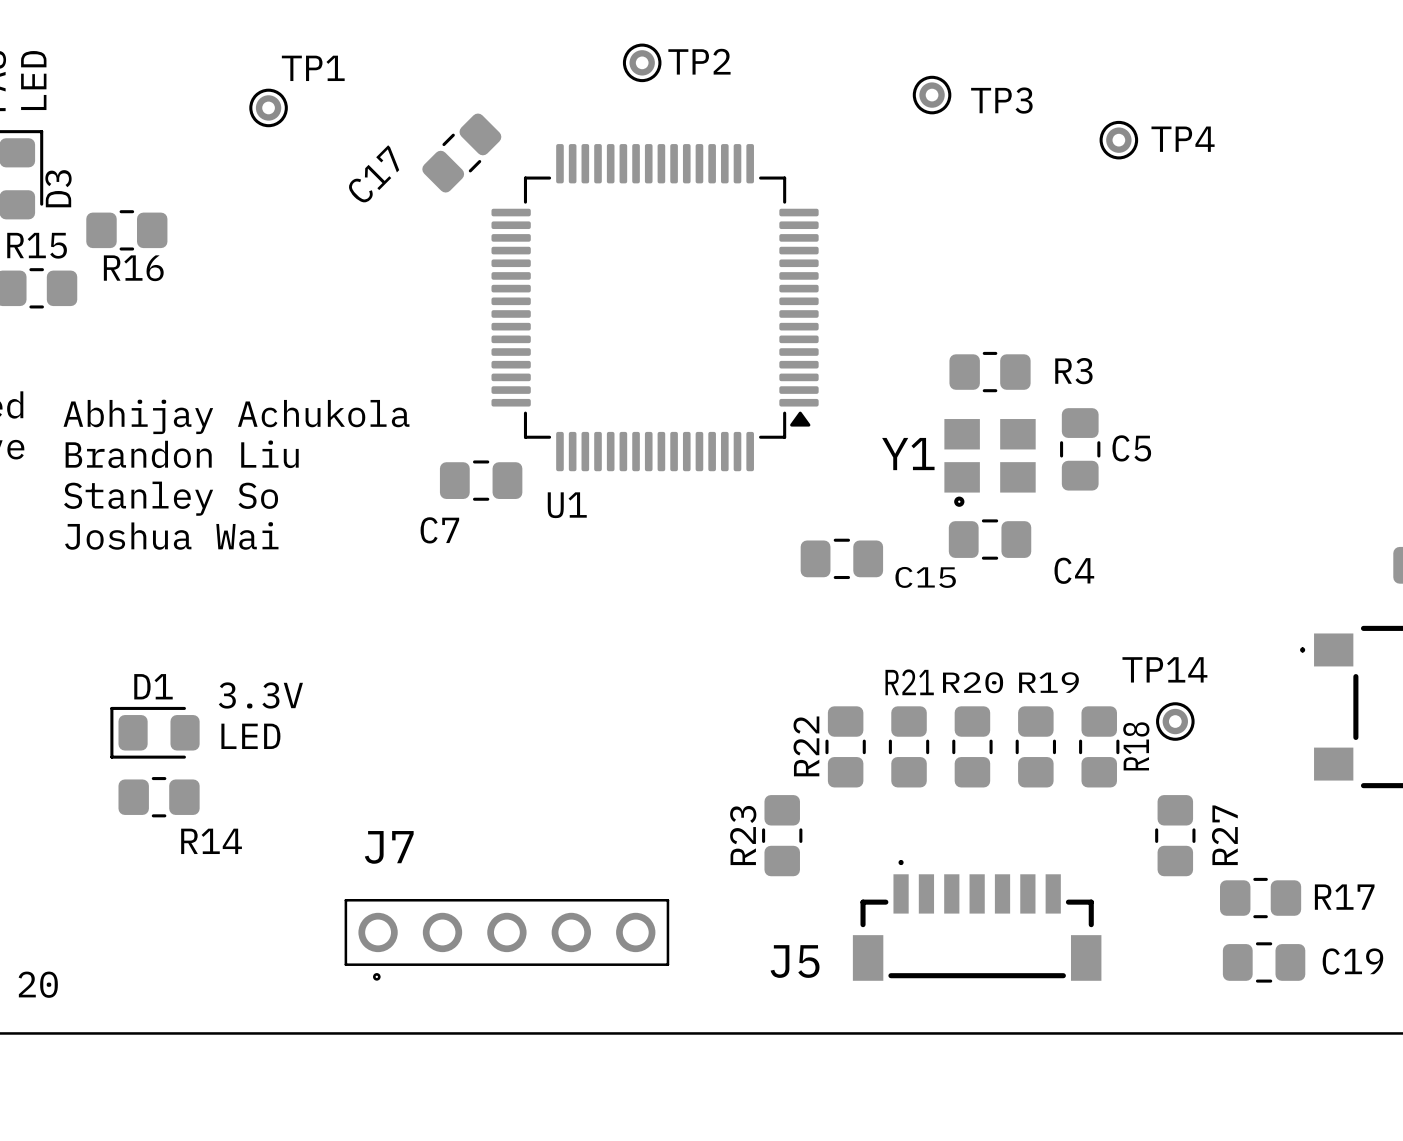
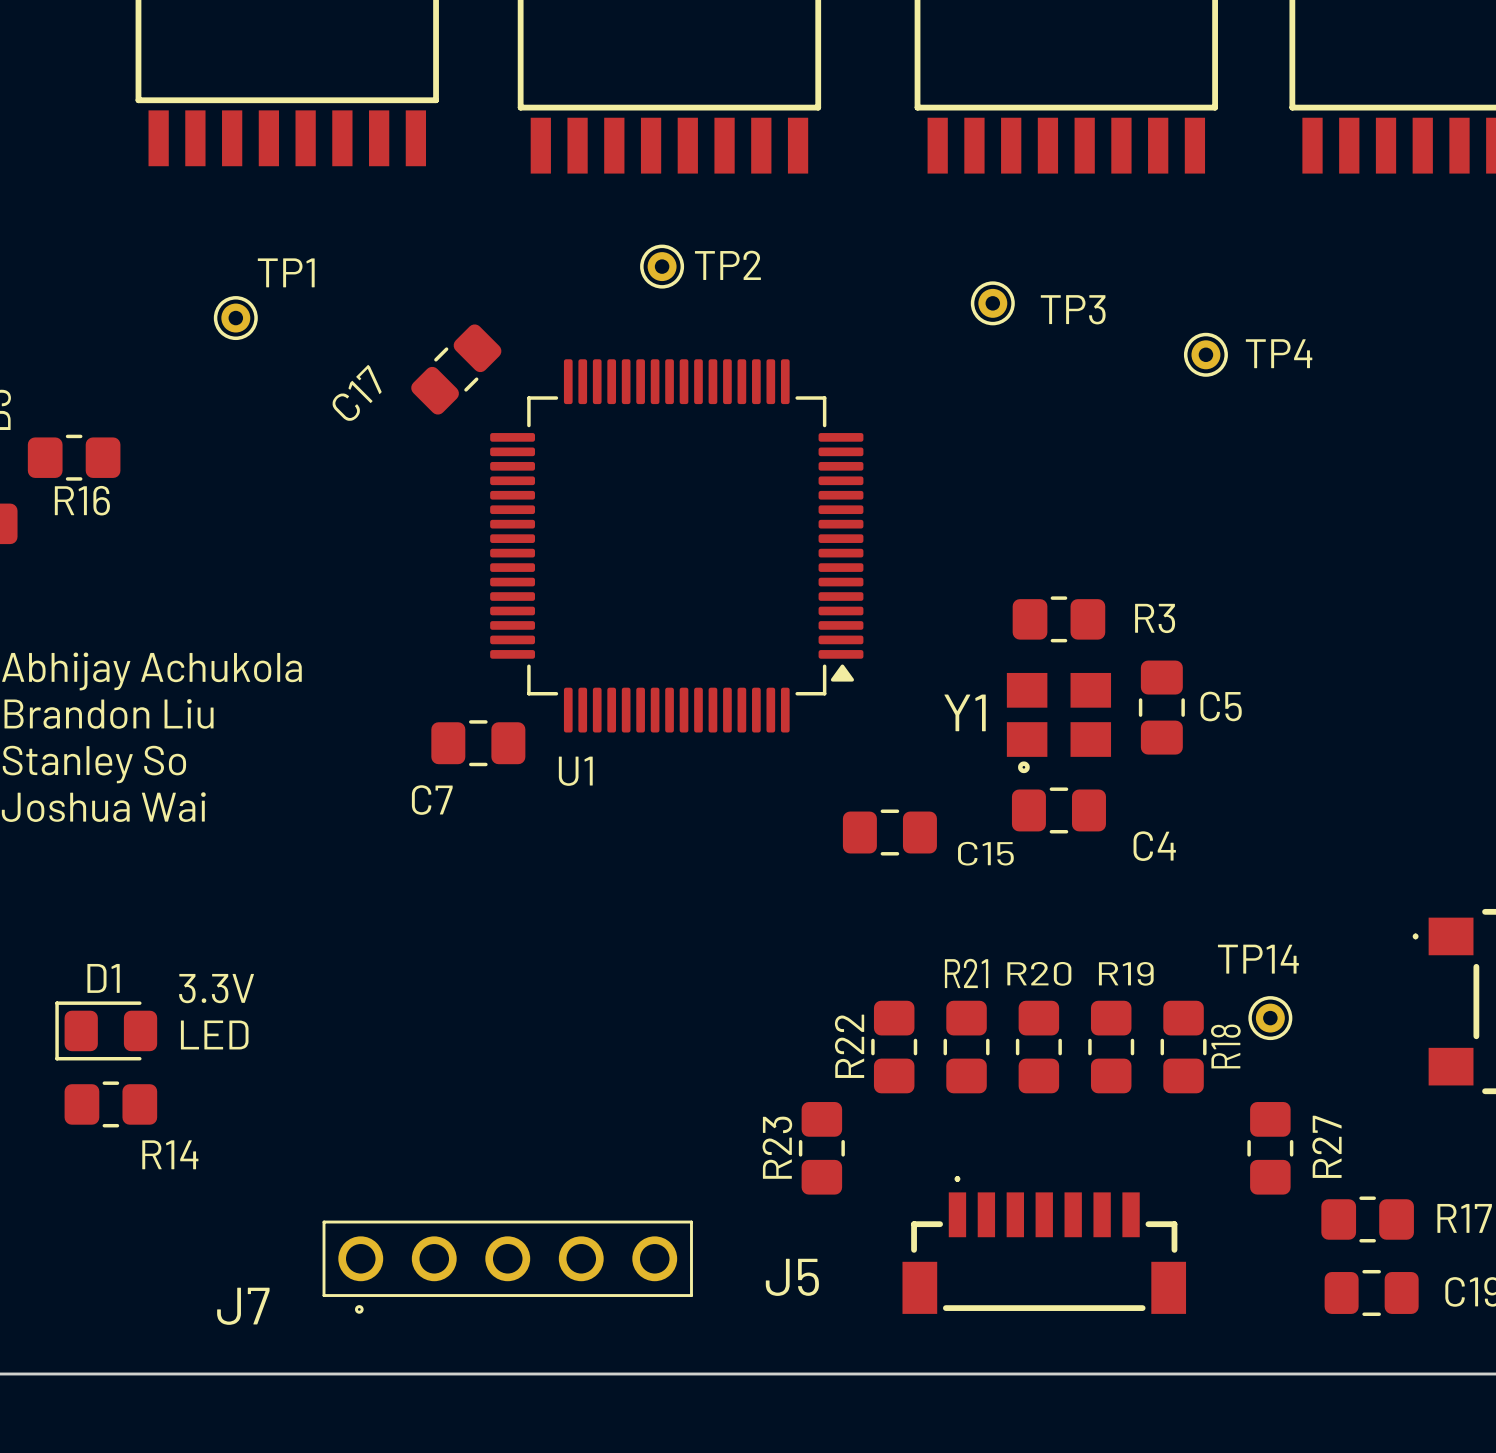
J7 name position: J7 (389, 847) -> J7 (243, 1306)
J5 name position: J5 (795, 961) -> J5 (792, 1277)

